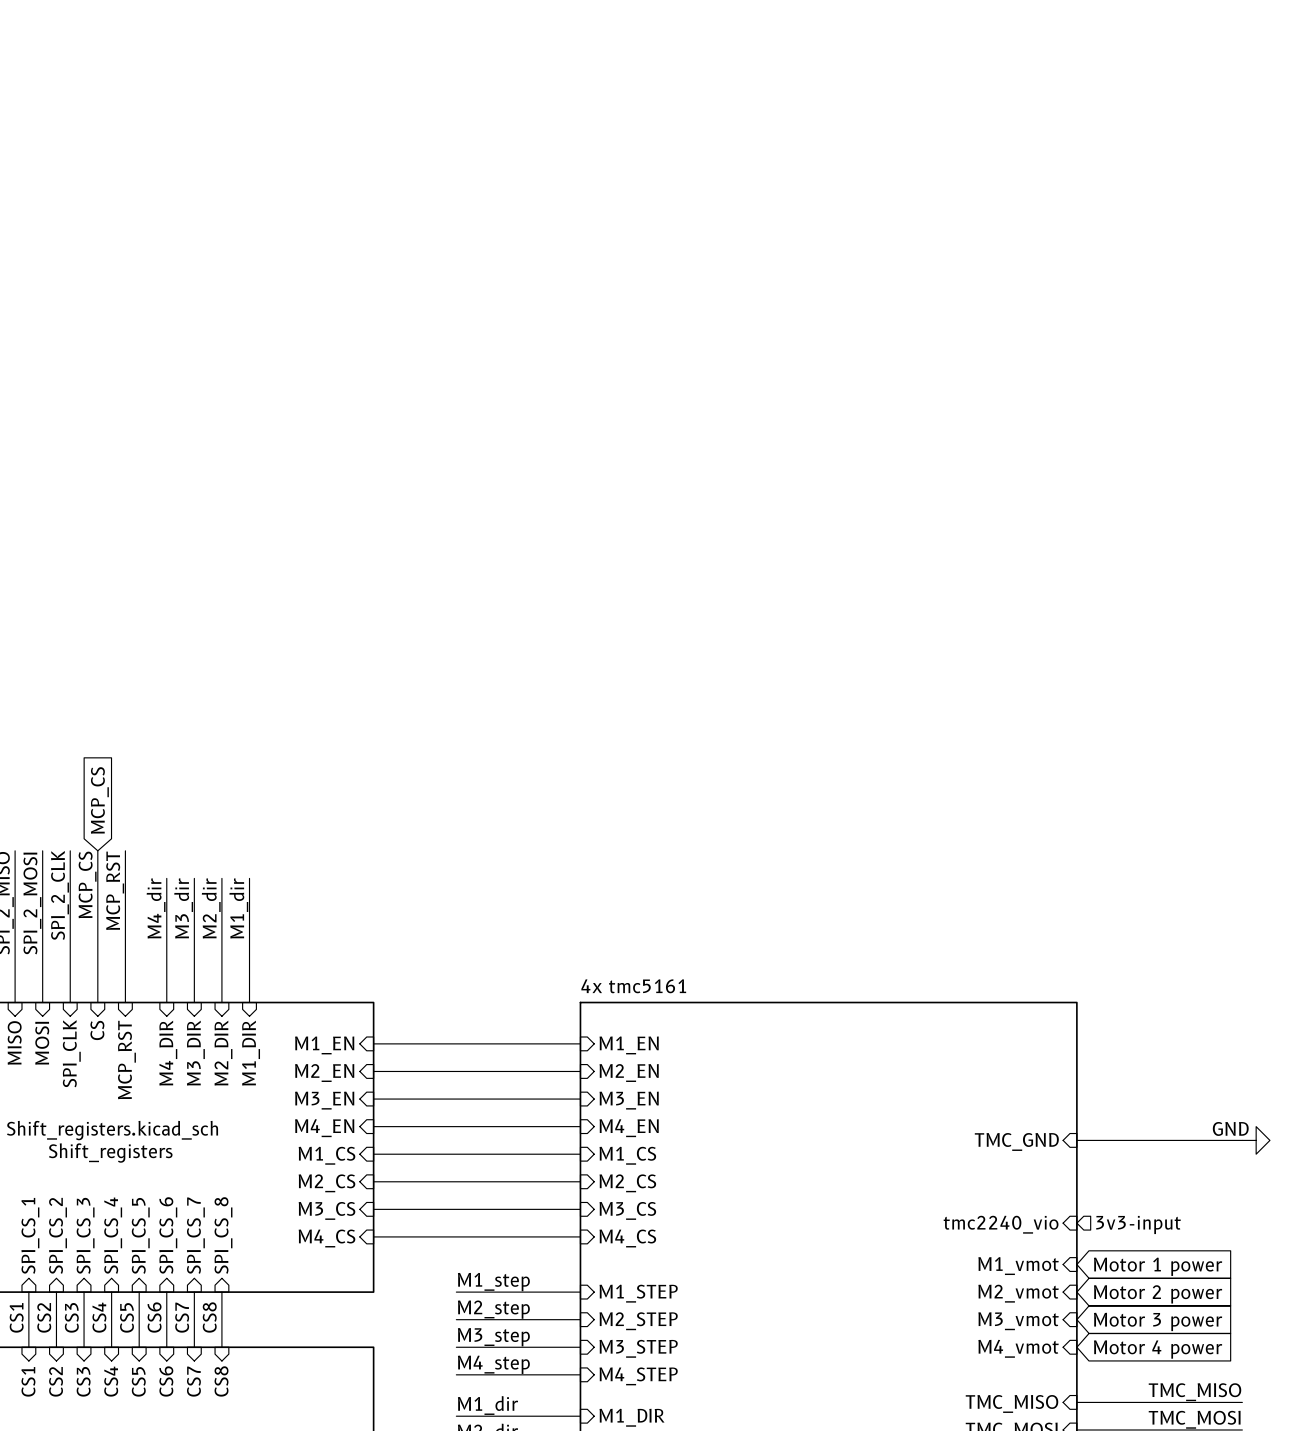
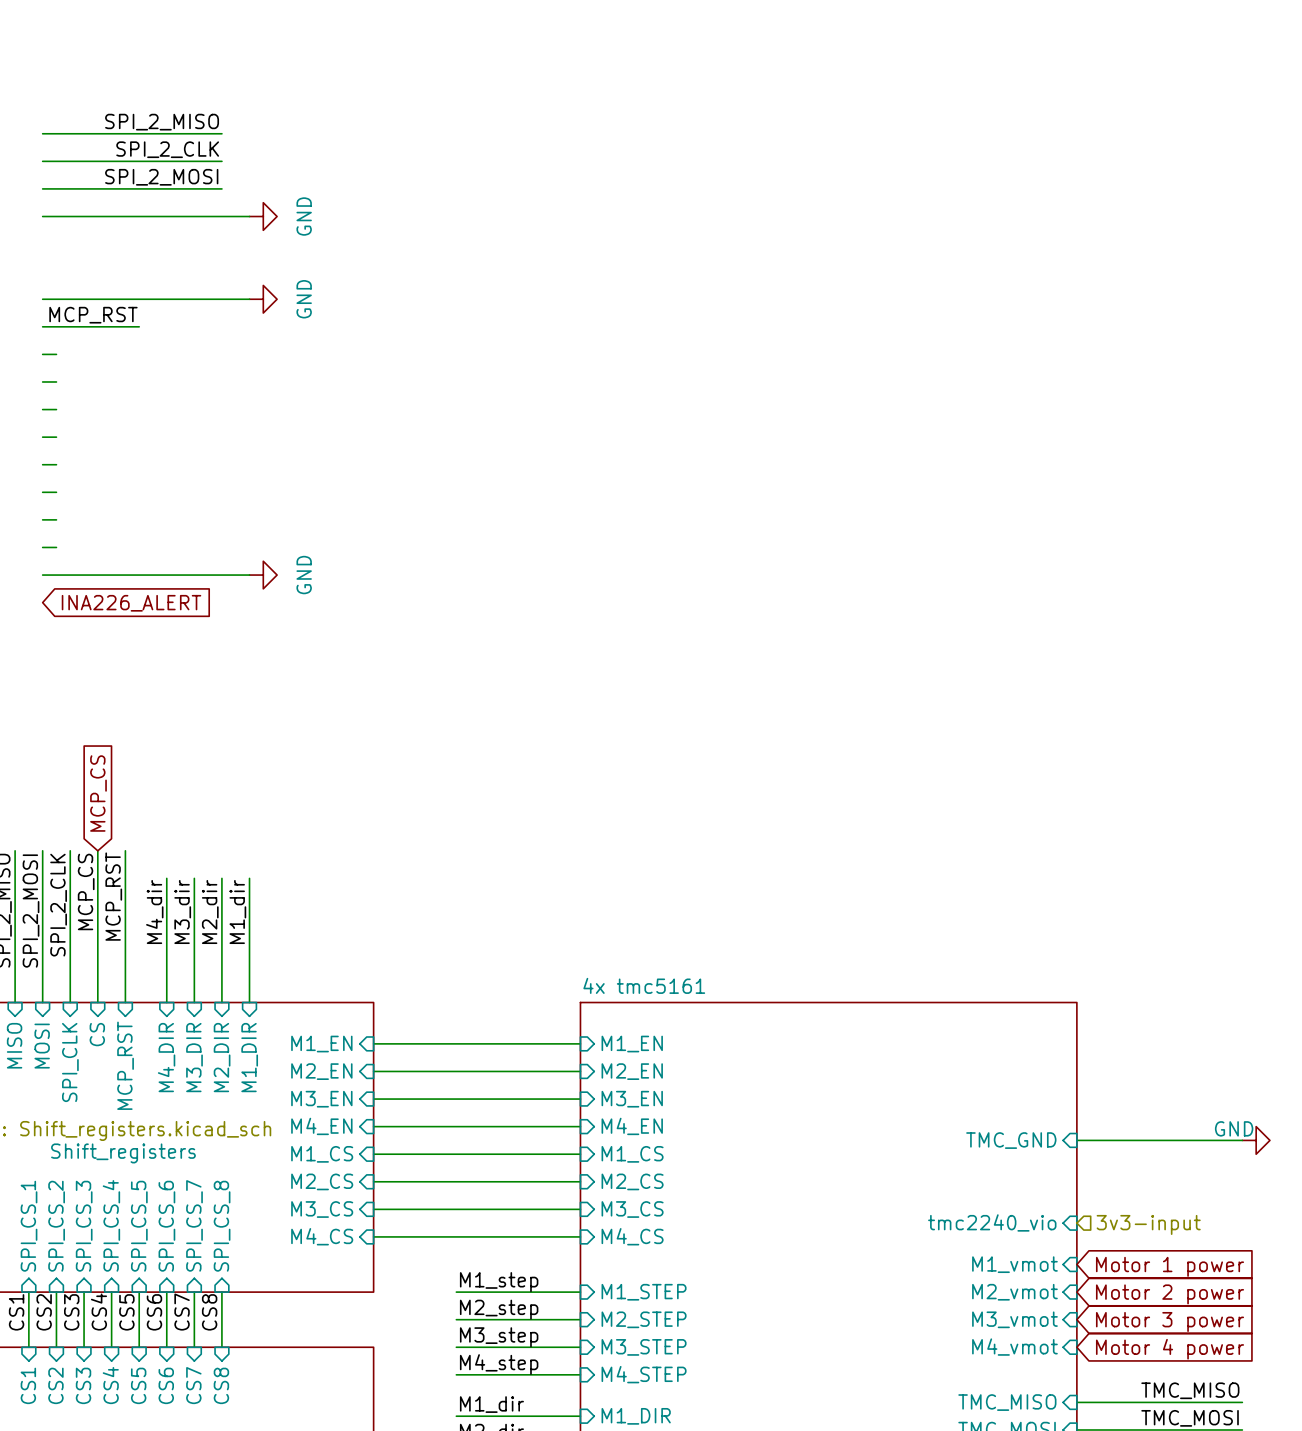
label: none -> SPI_2_MISO (162, 122)
wire: none -> (42, 133) (221, 133)
label: none -> SPI_2_CLK (167, 149)
wire: none -> (42, 161) (221, 161)
label: none -> SPI_2_MOSI (161, 177)
wire: none -> (42, 188) (221, 188)
wire: none -> (42, 216) (249, 216)
power symbol: none -> GND (263, 216)
wire: none -> (42, 299) (249, 299)
power symbol: none -> GND (263, 299)
label: none -> MCP_RST (93, 315)
wire: none -> (42, 326) (139, 326)
wire: none -> (42, 354) (56, 354)
wire: none -> (42, 381) (56, 381)
wire: none -> (42, 409) (56, 409)
wire: none -> (42, 437) (56, 437)
wire: none -> (42, 464) (56, 464)
wire: none -> (42, 492) (56, 492)
wire: none -> (42, 519) (56, 519)
wire: none -> (42, 547) (56, 547)
wire: none -> (42, 575) (249, 575)
power symbol: none -> GND (263, 575)
global label: none -> INA226_ALERT (131, 603)

